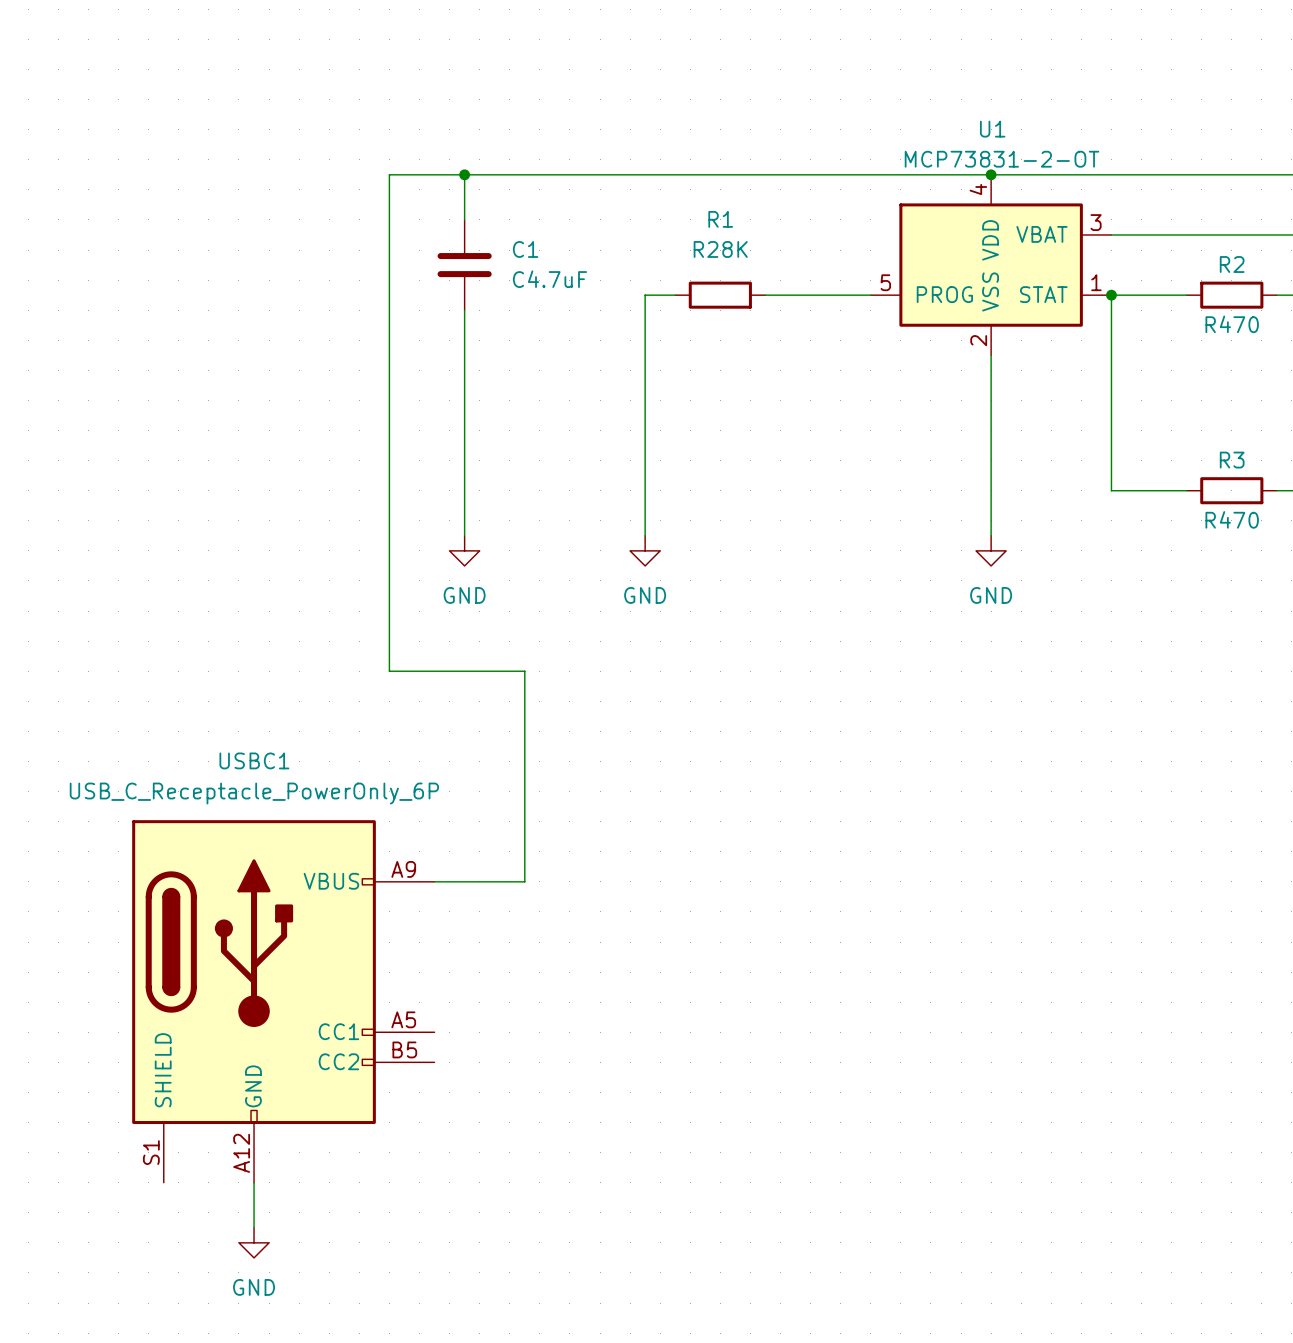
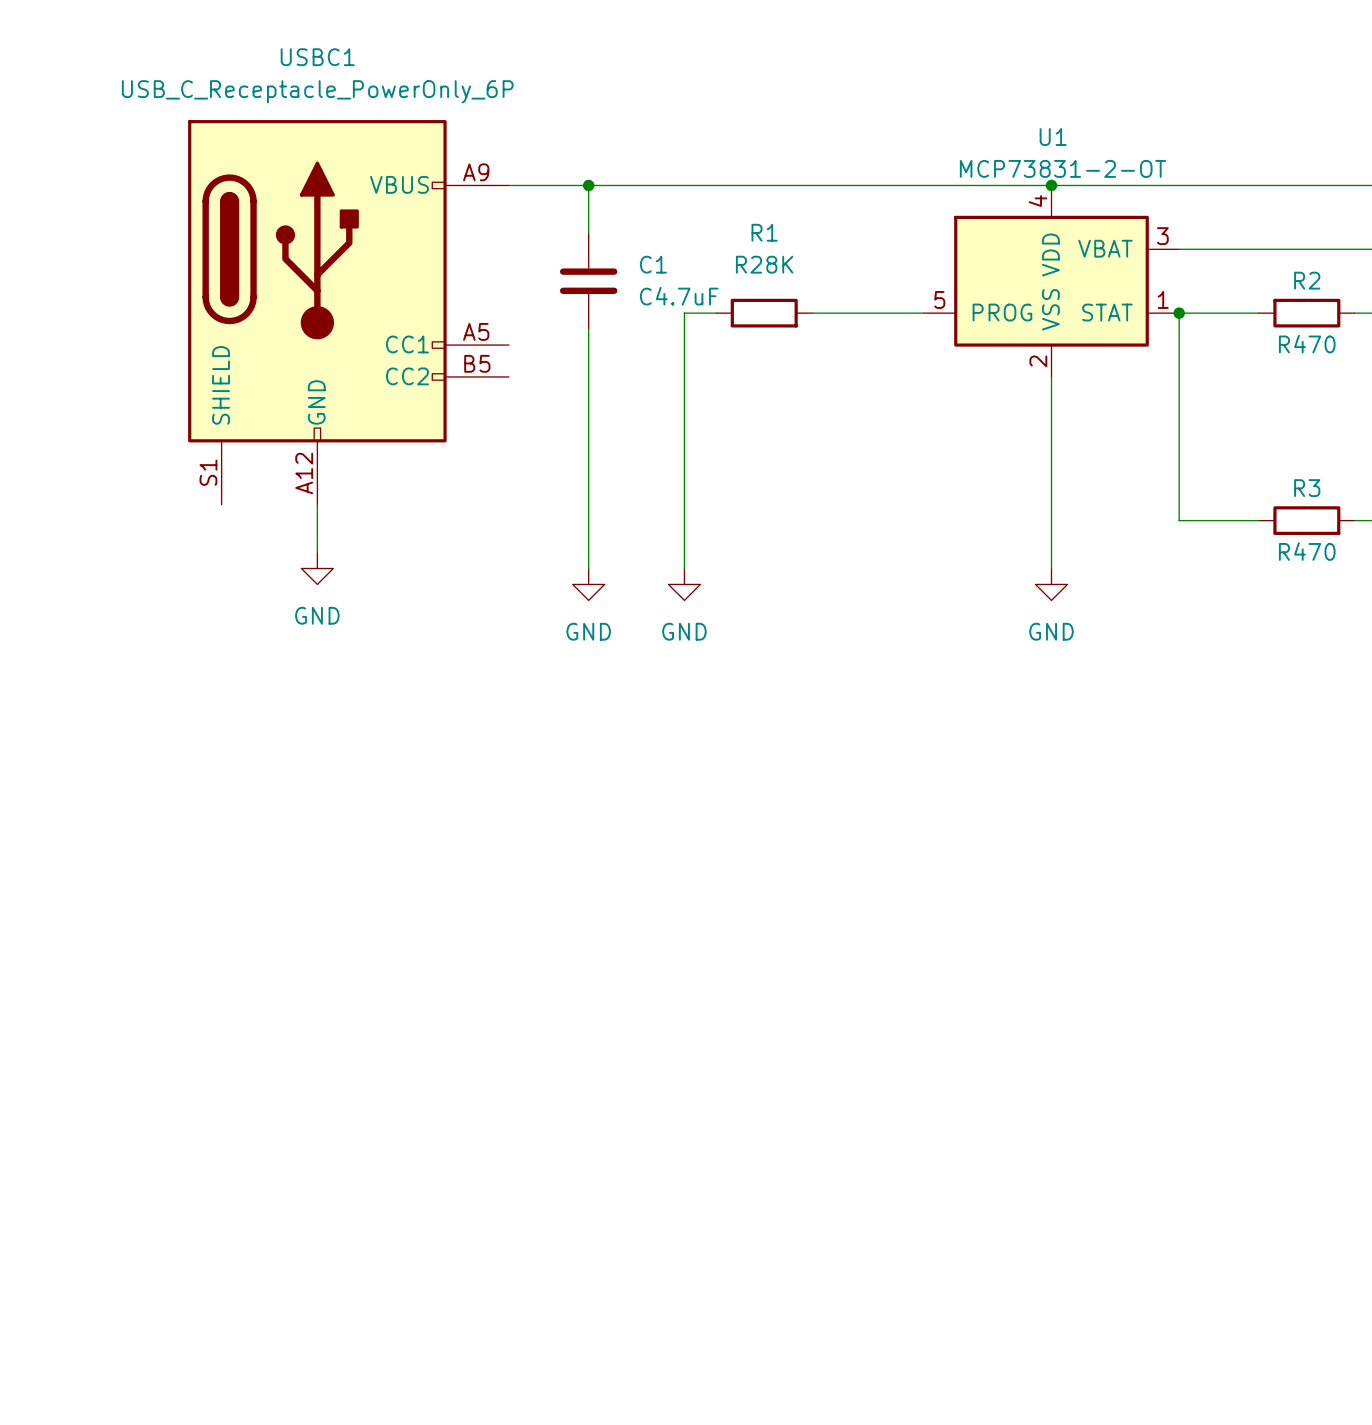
wire: (464, 174) (464, 219) -> (588, 185) (588, 233)
junction: (464, 174) -> none
wire: (479, 174) (389, 174) (389, 671) (524, 671) (524, 881) (434, 881) -> none
junction: none -> (588, 185)
C1 position: (464, 265) -> (588, 281)
wire: (464, 310) (464, 535) -> (588, 329) (588, 568)
wire: none -> (317, 504) (317, 552)
power symbol: none -> GND (317, 568)
power symbol: GND (464, 550) -> none
power symbol: none -> GND (588, 584)
USBC1 symbol: [132, 820, 435, 1183] -> [188, 120, 509, 505]
wire: (254, 1182) (254, 1227) -> none
power symbol: GND (254, 1242) -> none

